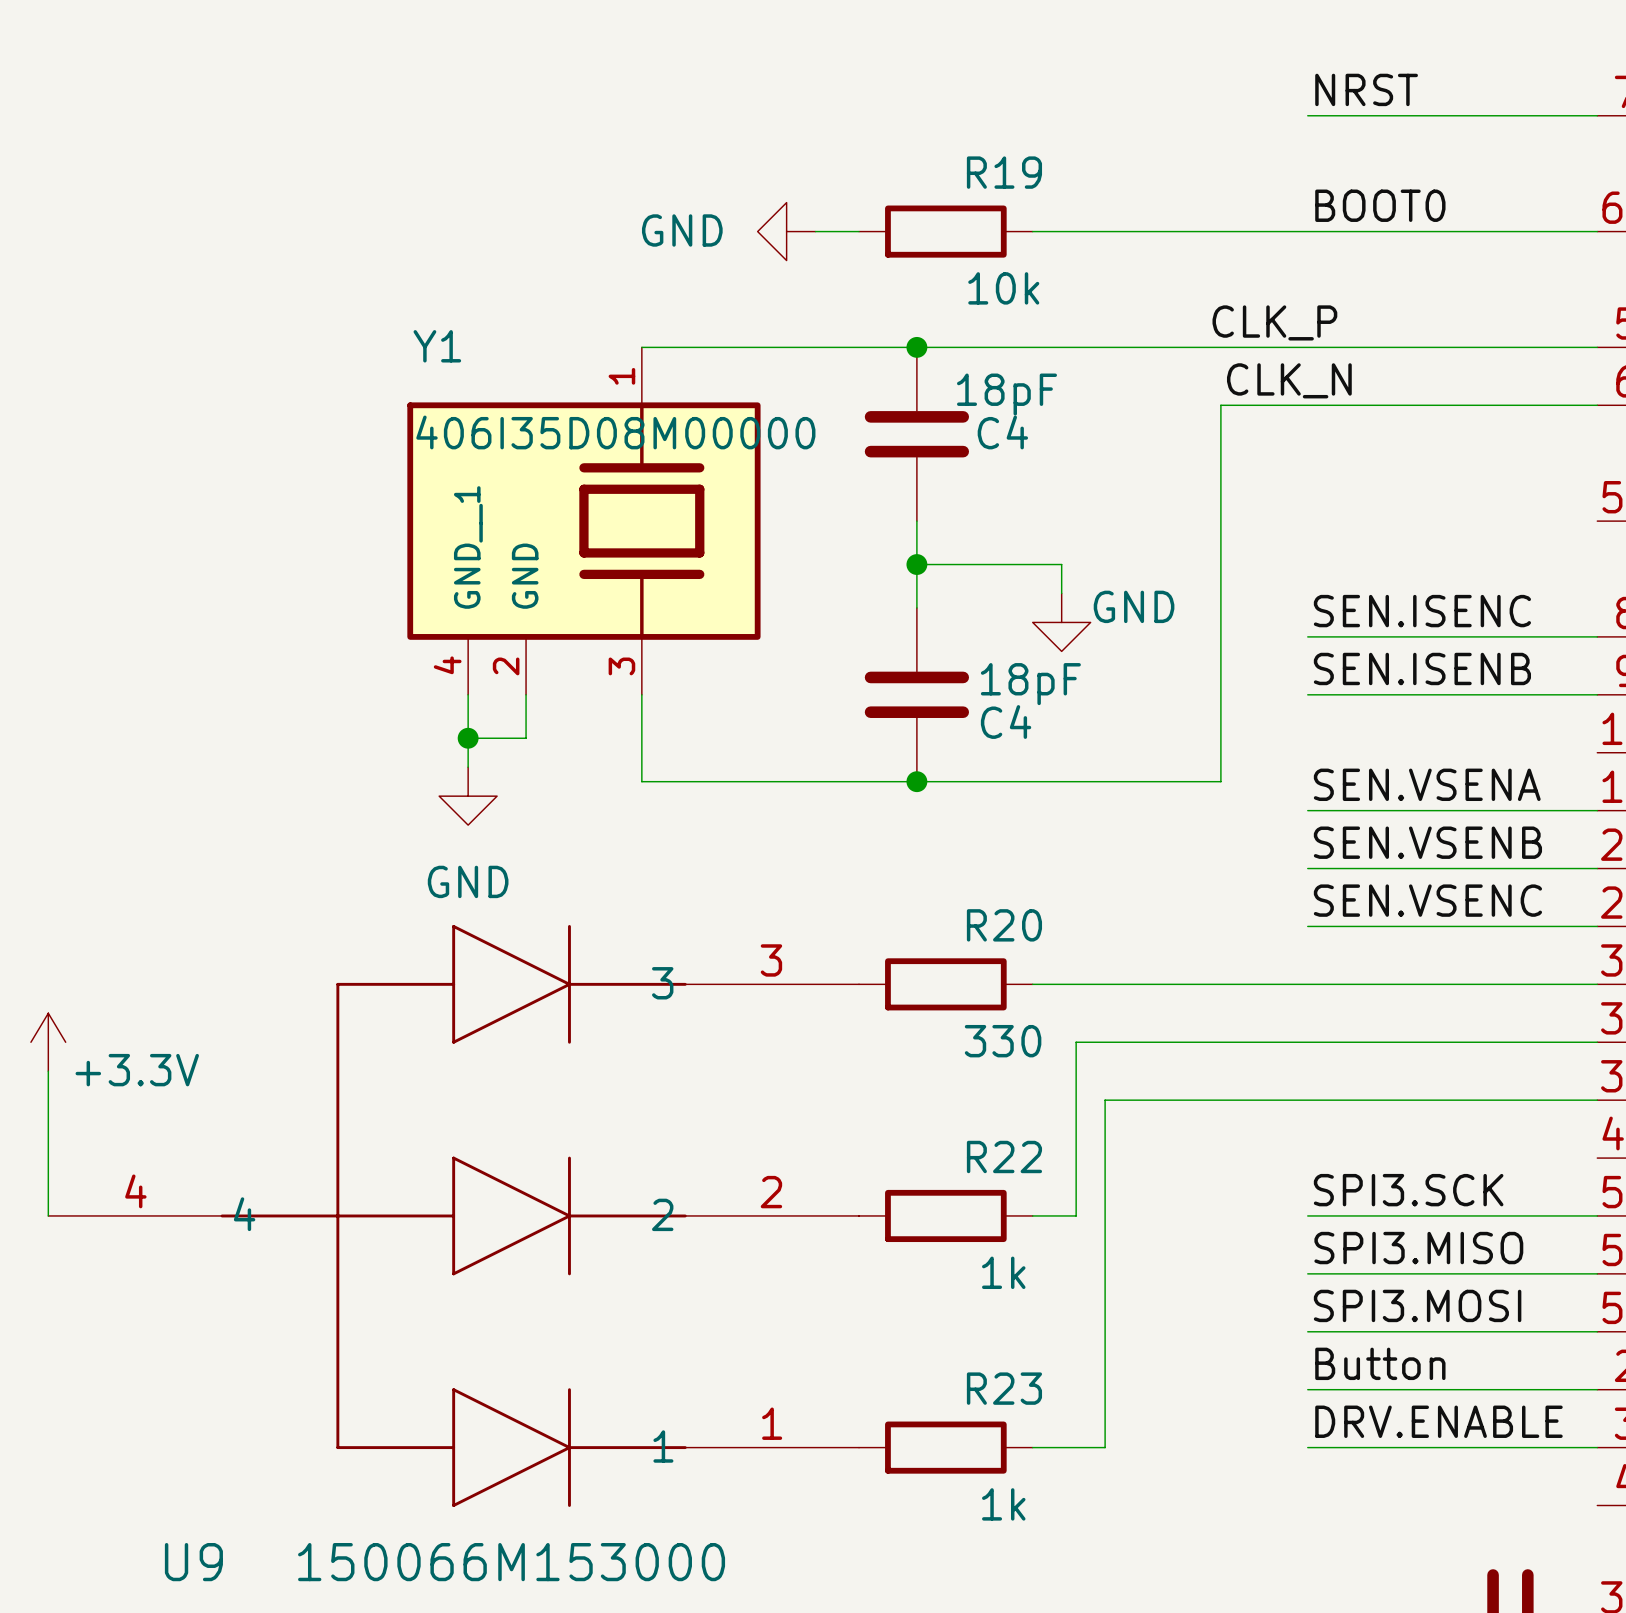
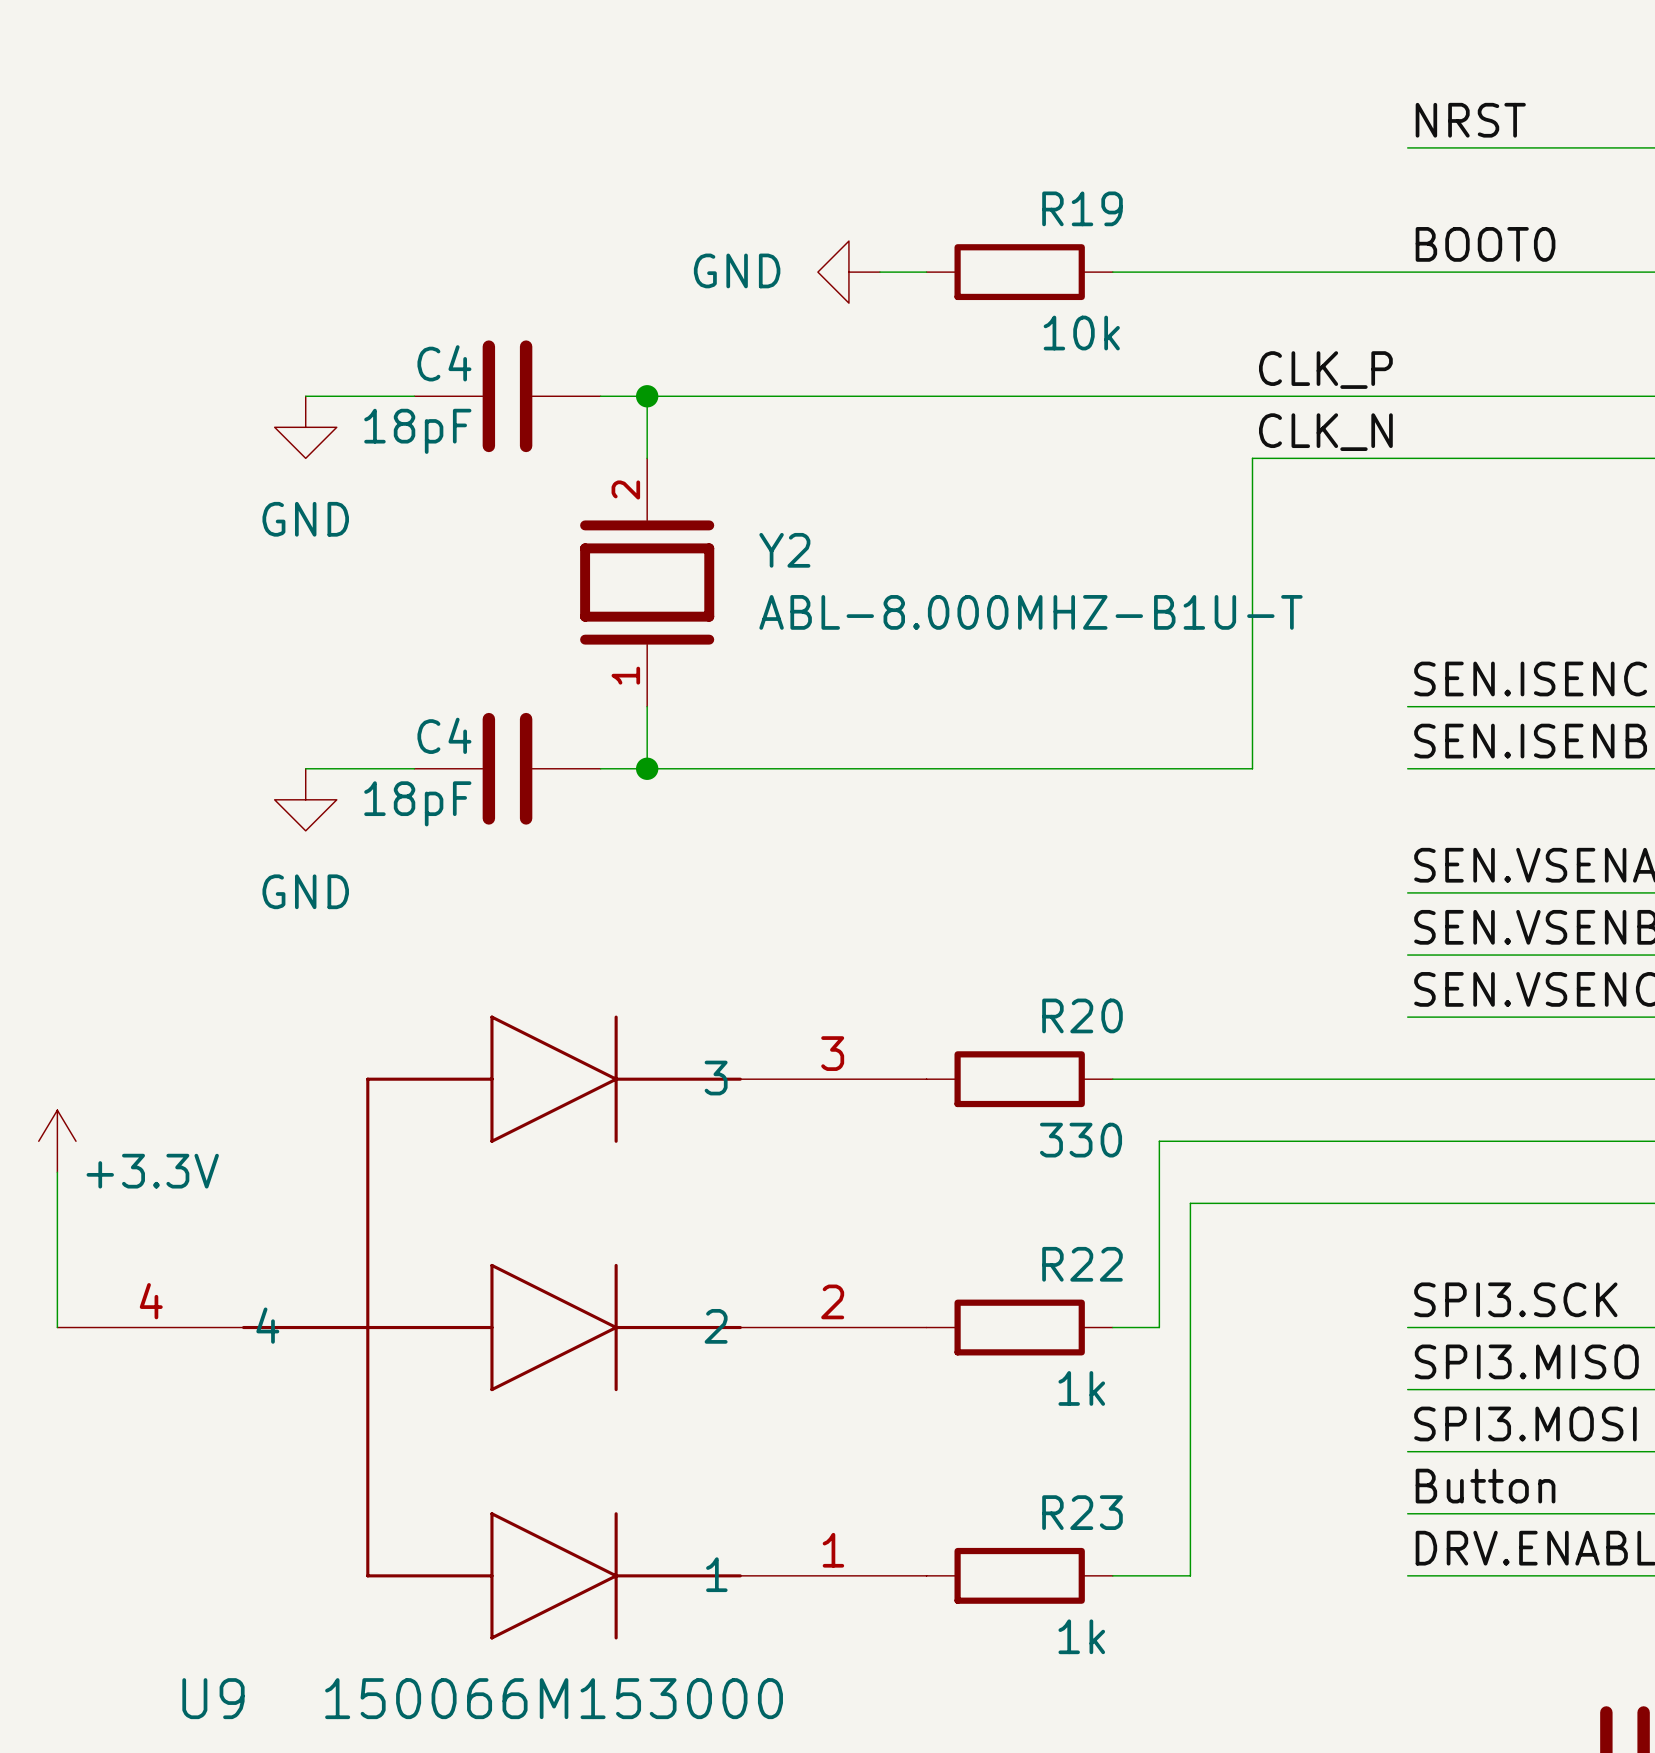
label position: CLK_P (1274, 322) -> CLK_P (1325, 370)
wire: none -> (305, 396) (414, 396)
C4: none -> 18pF (507, 396)
wire: none -> (600, 396) (693, 396)
wire: none -> (647, 396) (647, 458)
junction: none -> (647, 396)
junction: (916, 347) -> none
power symbol: none -> GND (305, 427)
label position: CLK_N (1289, 380) -> CLK_N (1325, 432)
wire: (1220, 405) (1220, 781) (641, 781) (641, 694) -> (1314, 458) (1252, 458) (1252, 768) (600, 768)
C4: 18pF (916, 434) -> none
Y1: 406I35D08M00000 (583, 521) -> none
Y2: none -> ABL-8.000MHZ-B1U-T (647, 582)
wire: (916, 521) (916, 607) -> none
wire: (916, 564) (1061, 564) (1061, 593) -> none
junction: (916, 564) -> none
power symbol: GND (1061, 622) -> none
wire: none -> (647, 706) (647, 768)
wire: none -> (305, 768) (414, 768)
wire: (468, 694) (468, 767) -> none
C4: none -> 18pF (507, 768)
wire: (526, 694) (526, 738) (468, 738) -> none
junction: none -> (647, 768)
C4: 18pF (916, 694) -> none
junction: (468, 738) -> none
junction: (916, 781) -> none
power symbol position: GND (468, 796) -> GND (305, 799)

